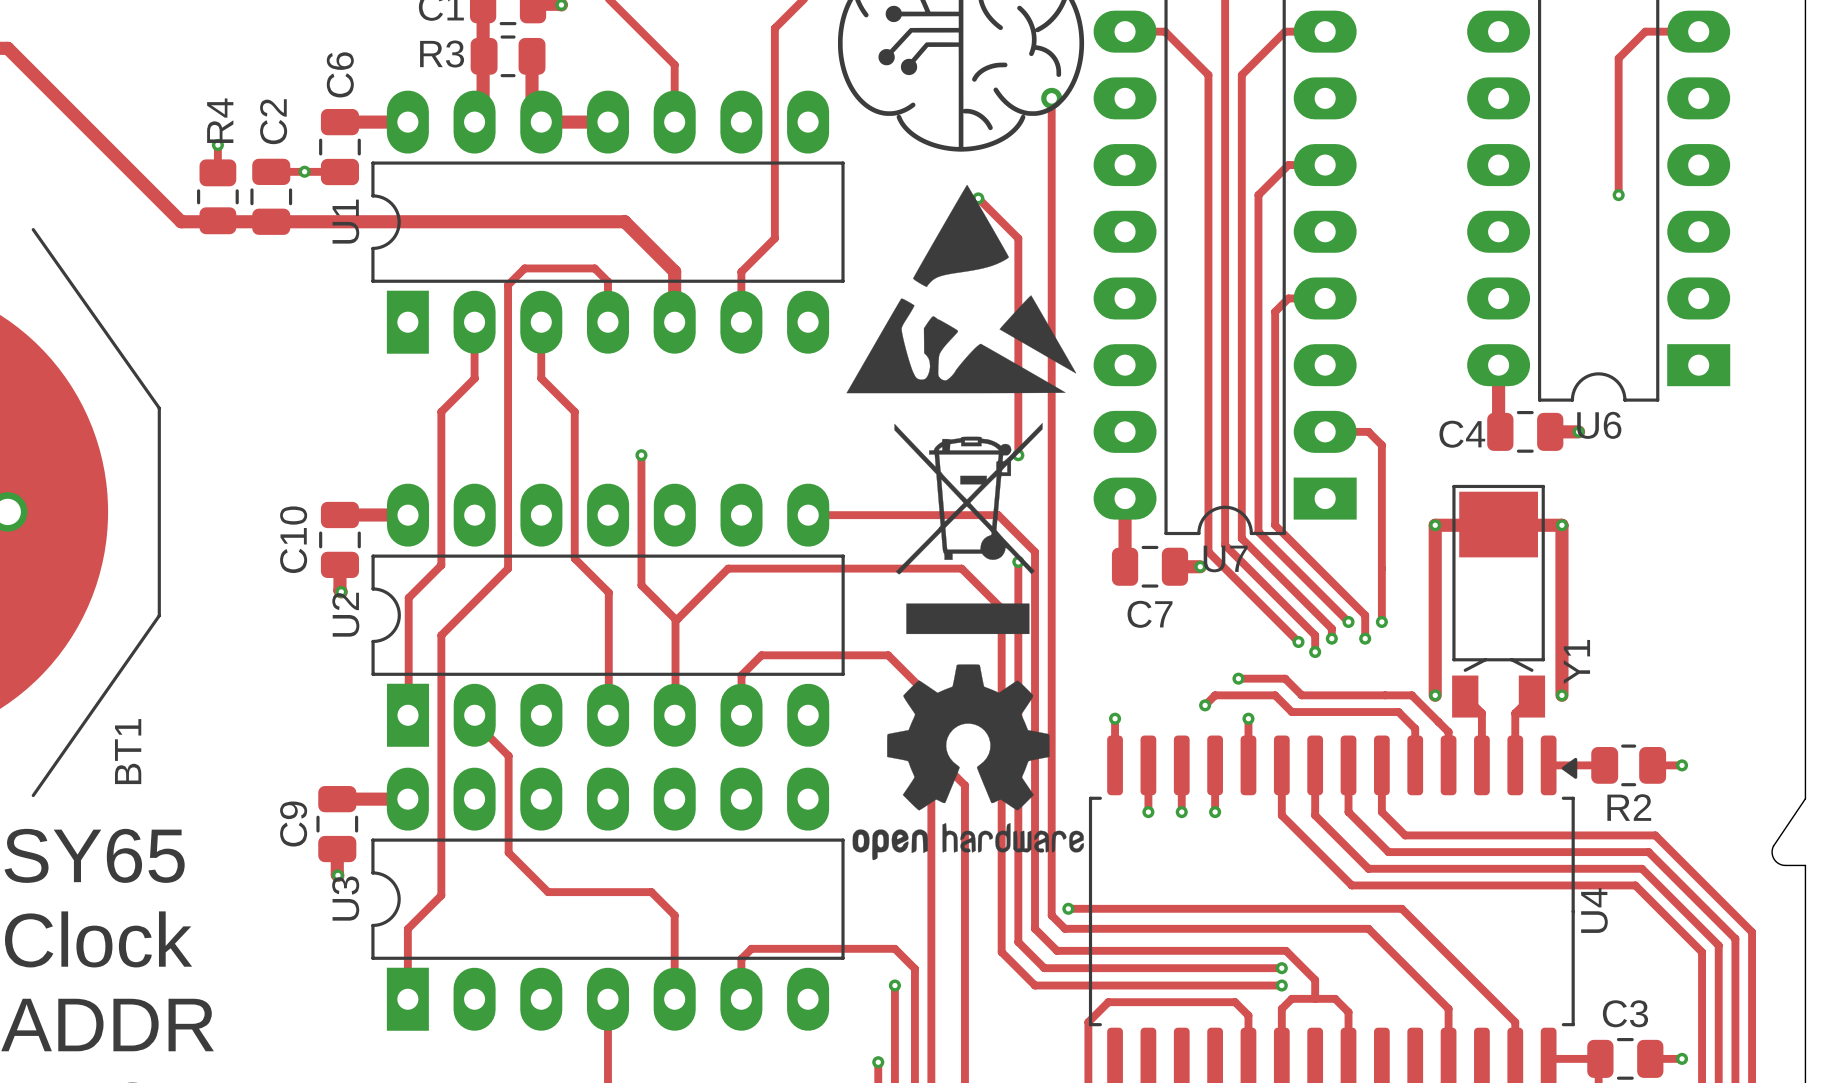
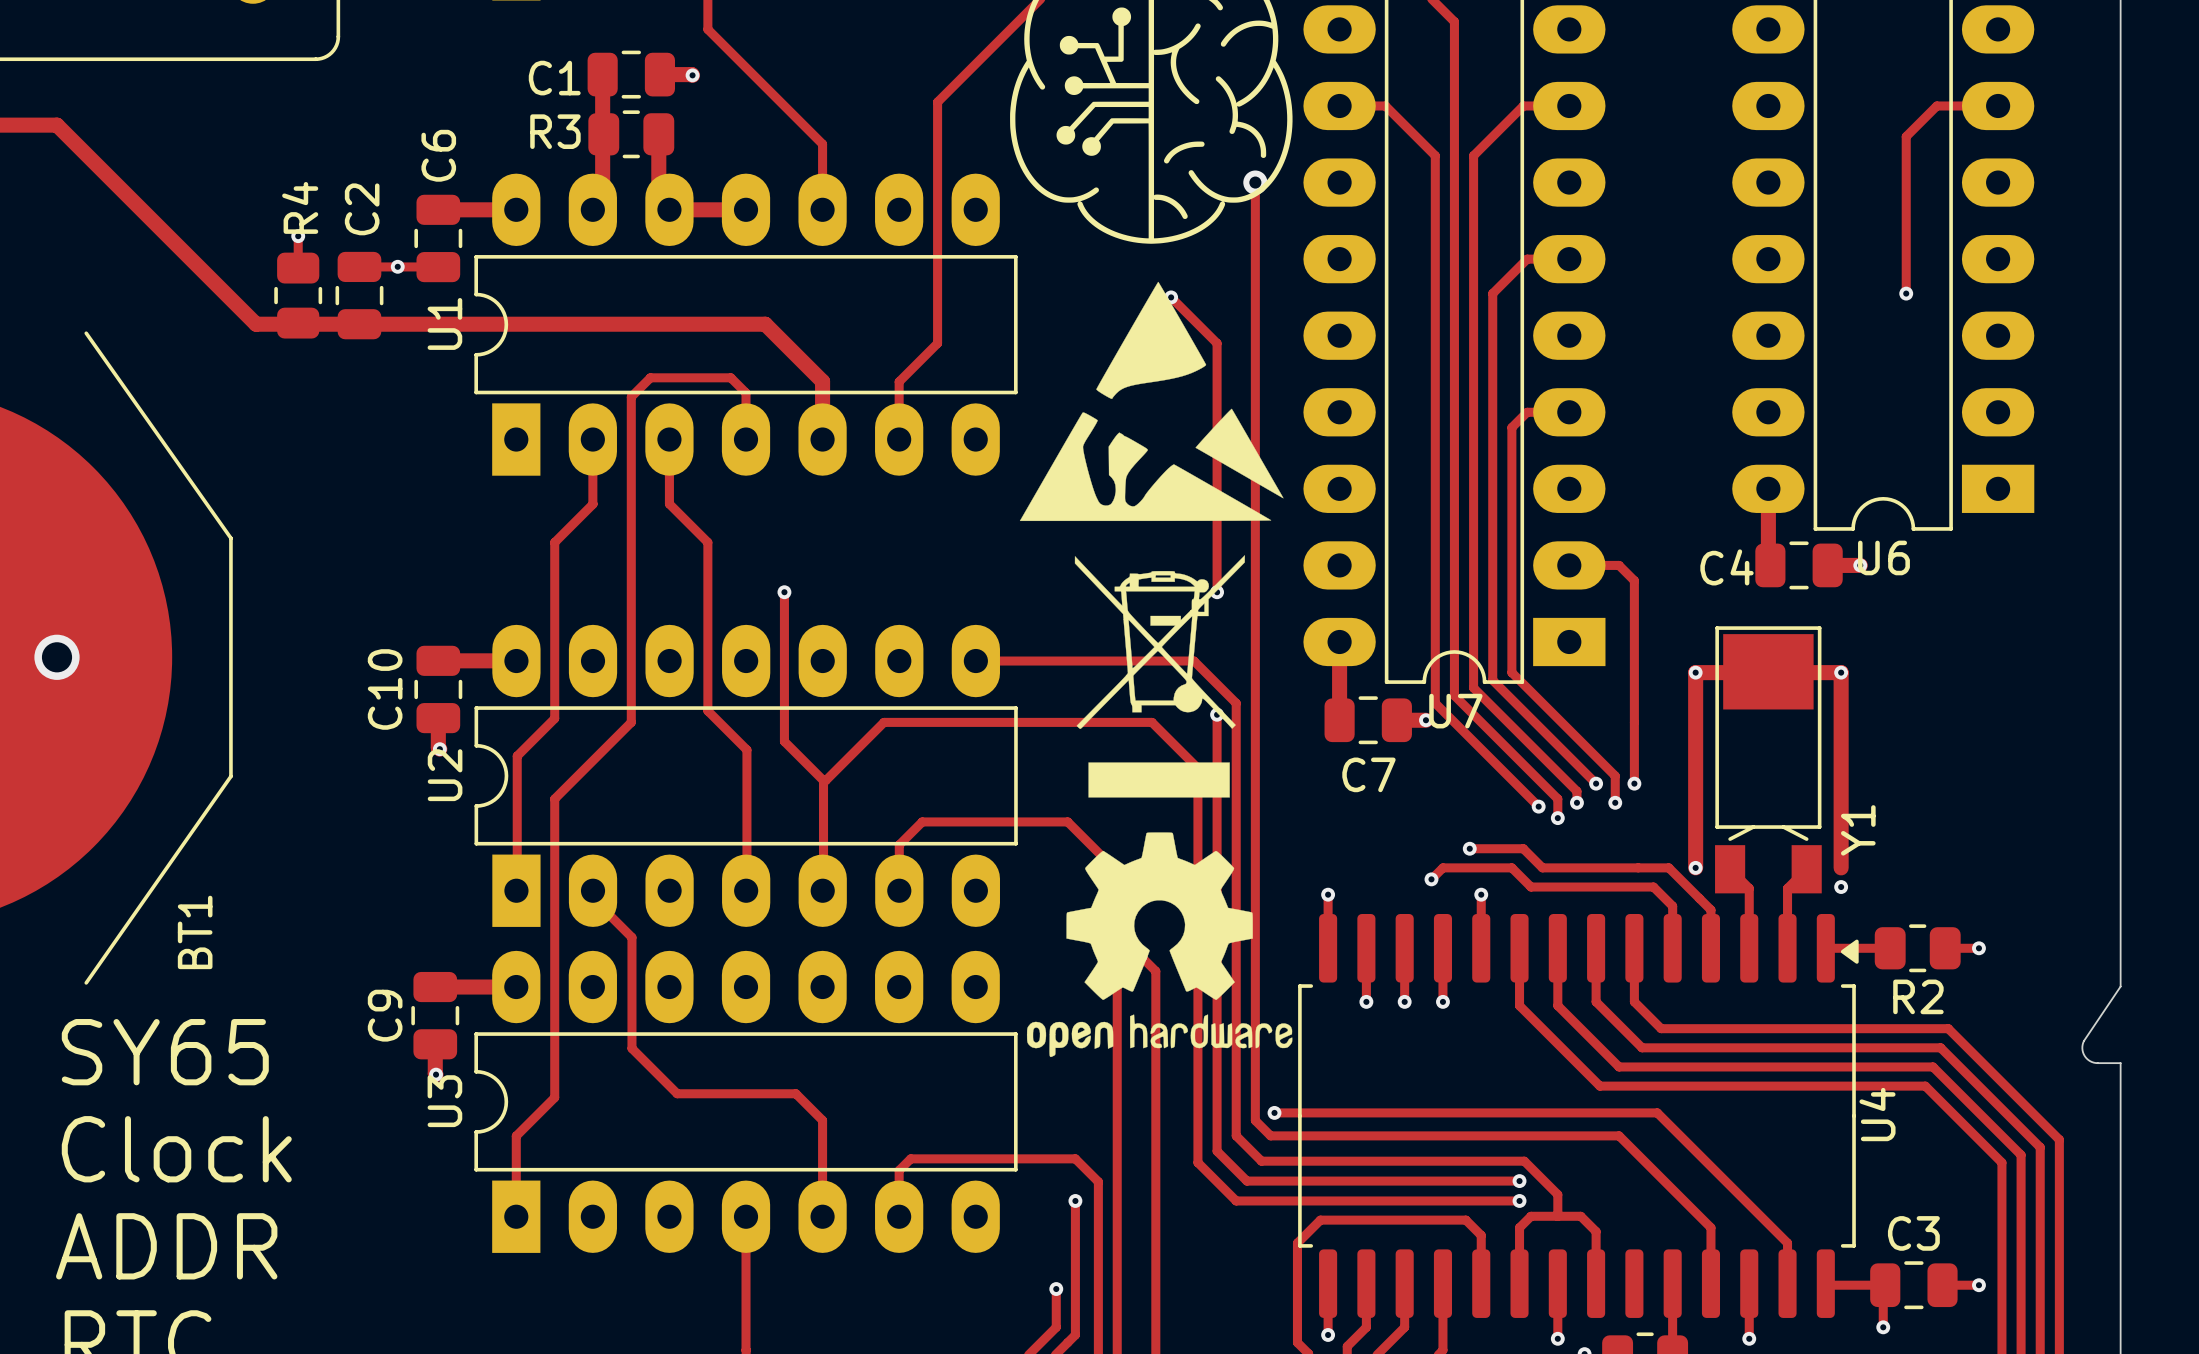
via position: (1561, 695) -> (1841, 887)

